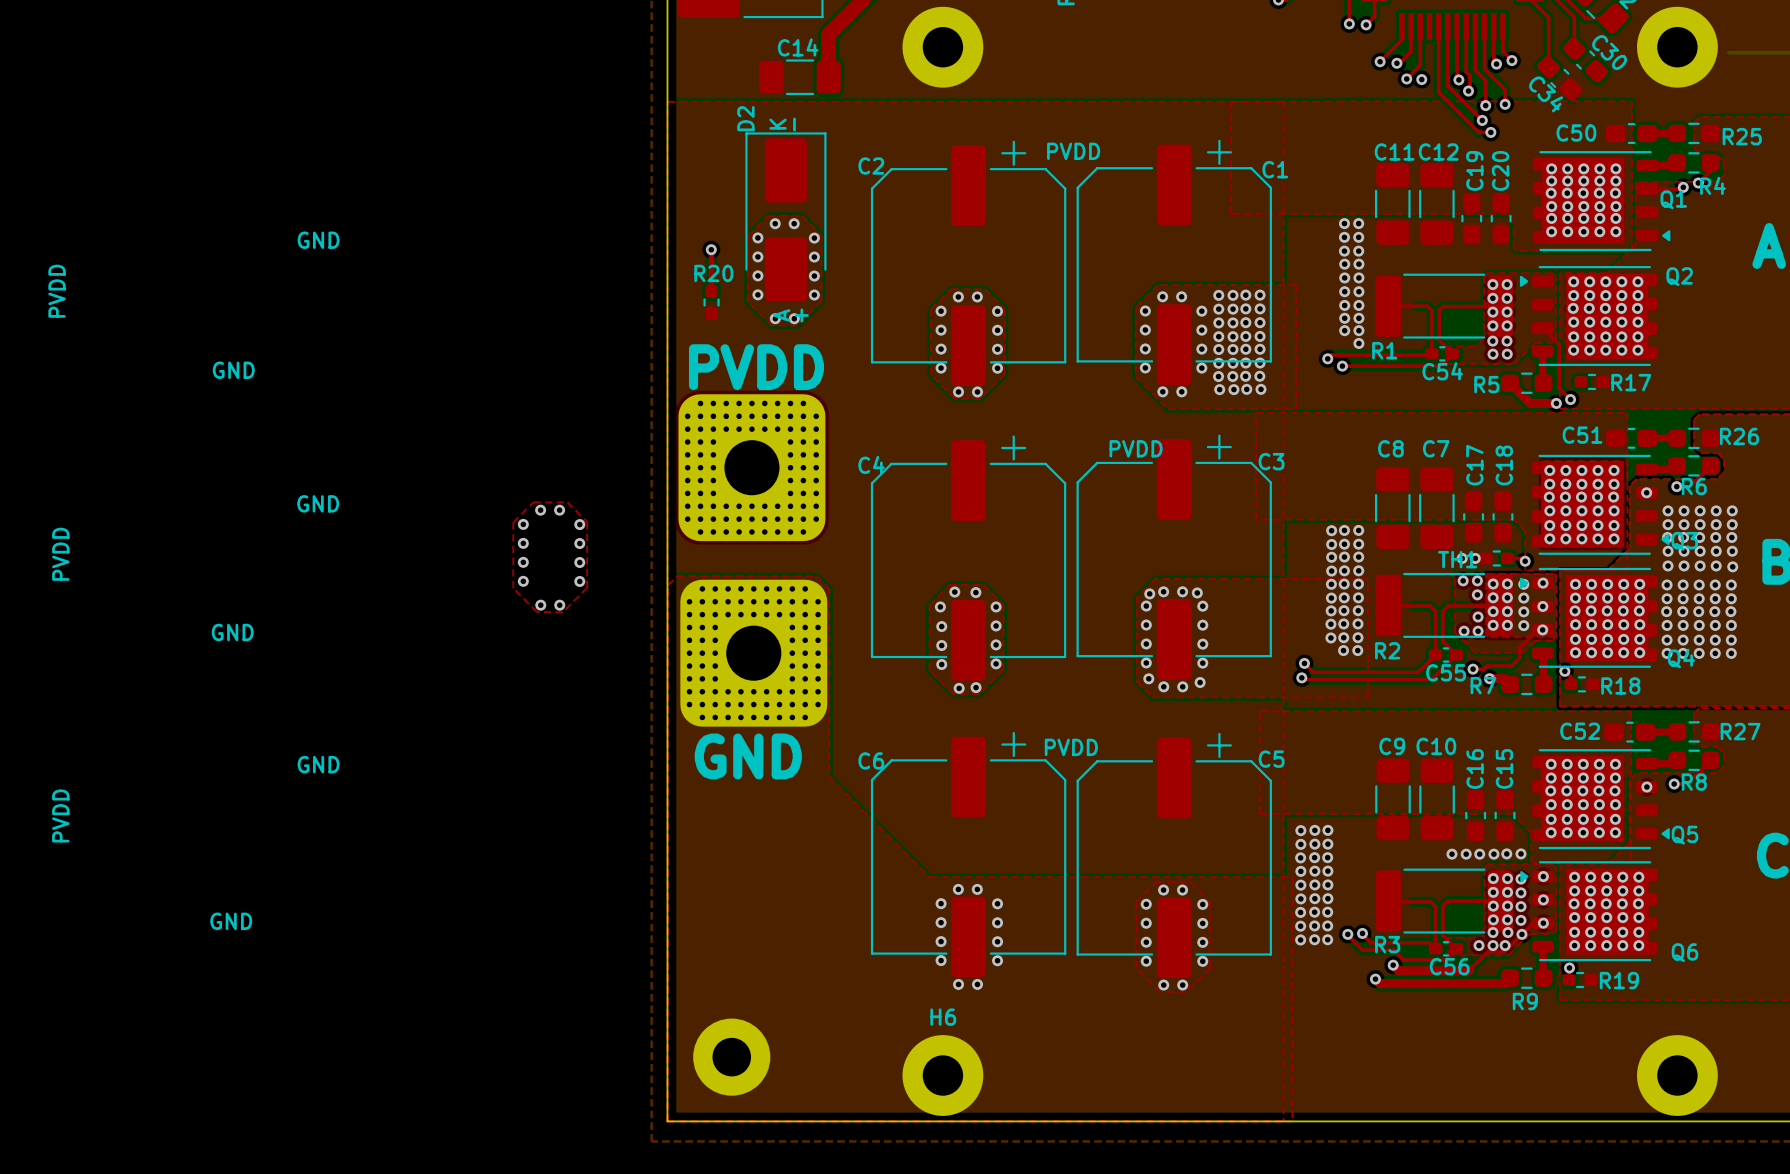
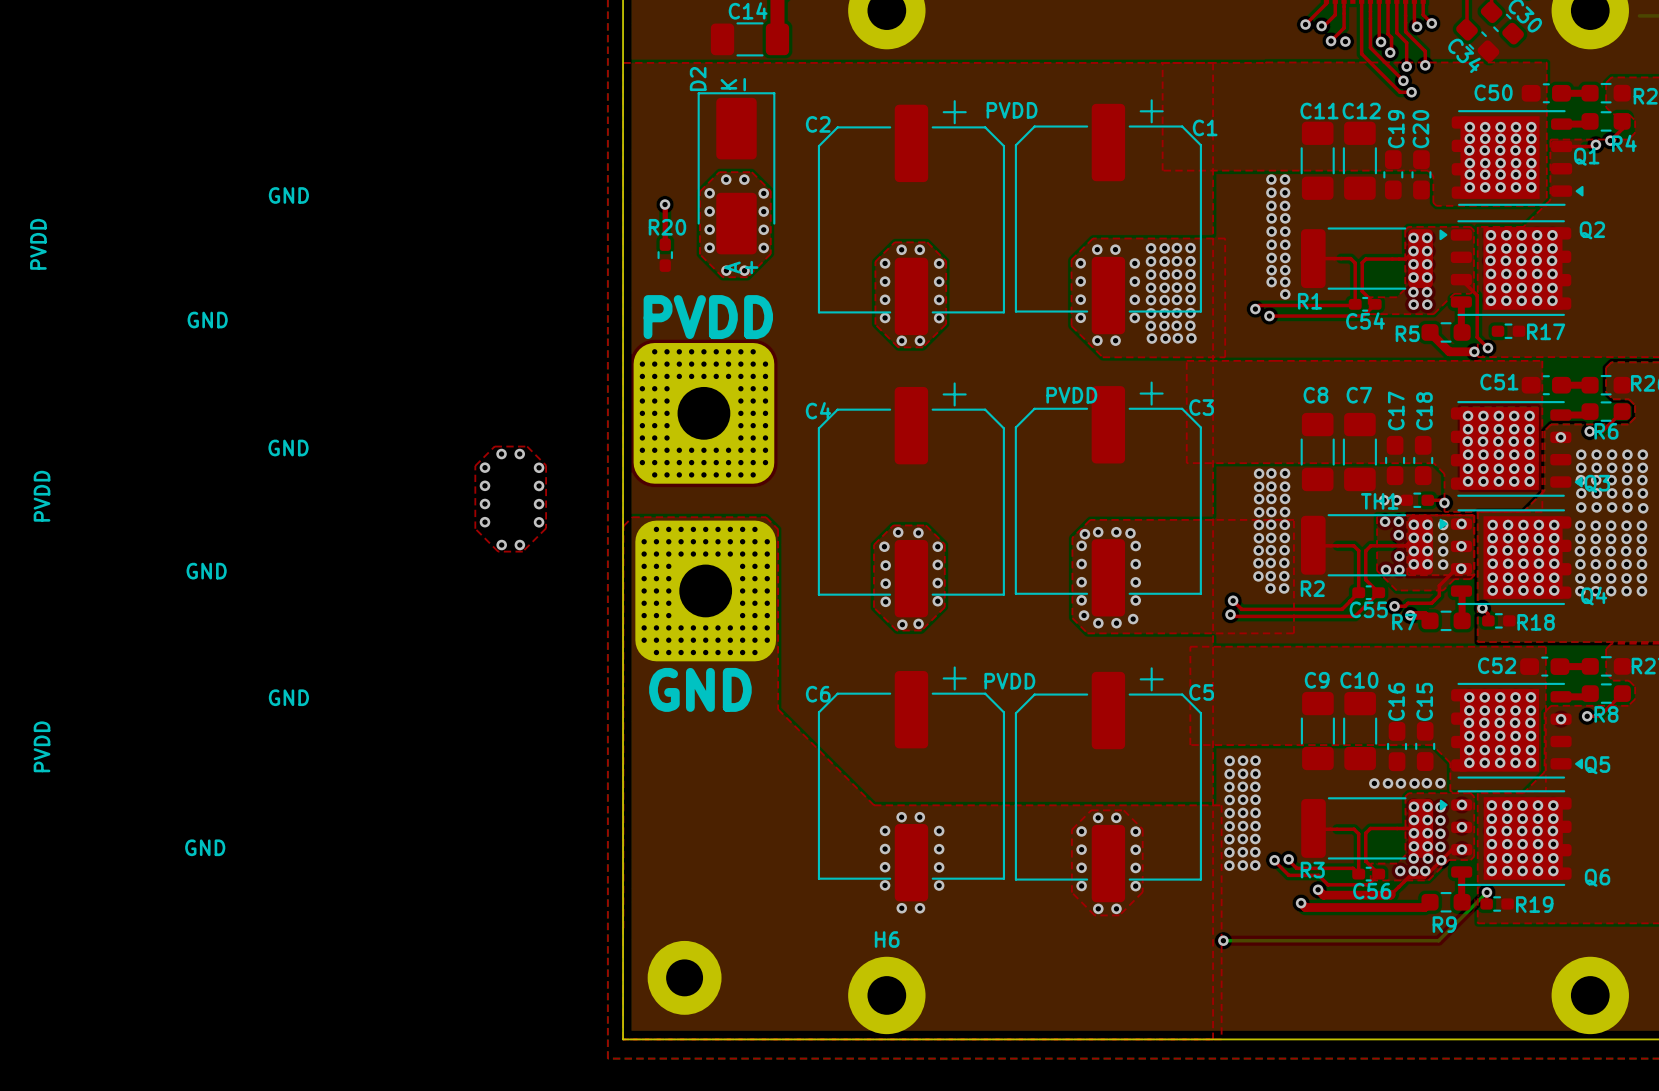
bottom track: none -> (1486, 892) (1438, 940) (1223, 940)
via: none -> (1223, 940)

